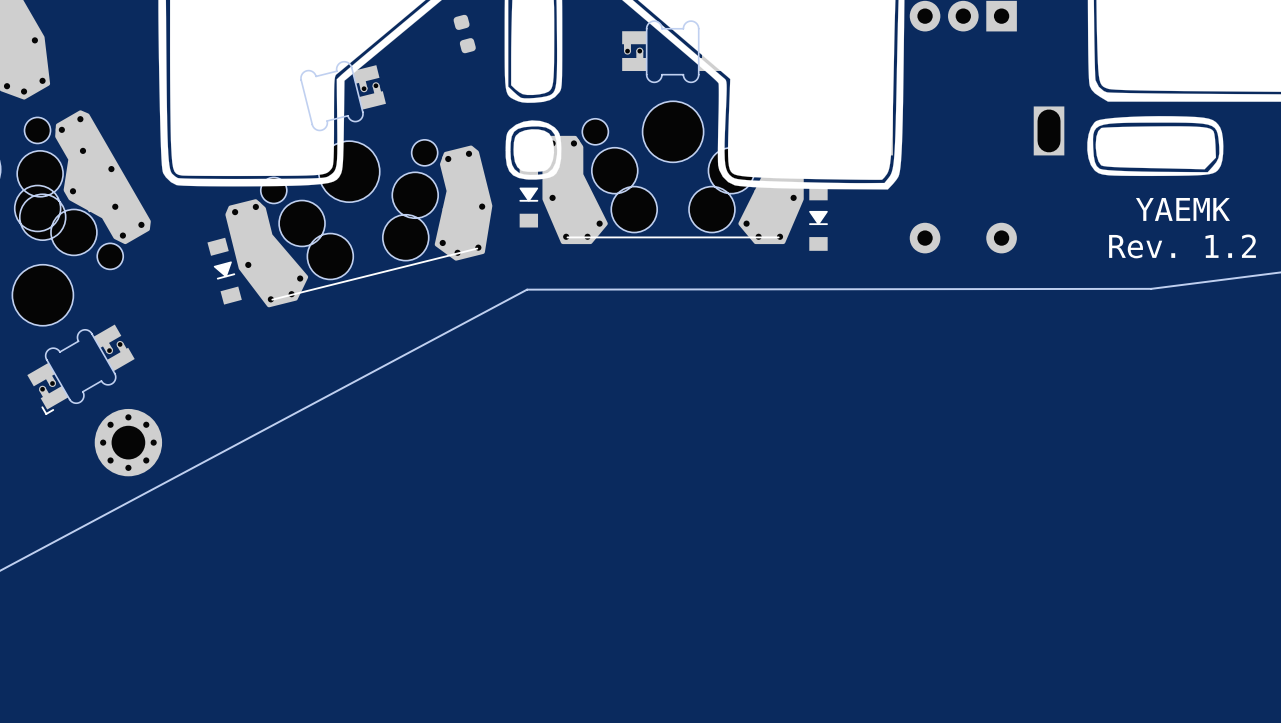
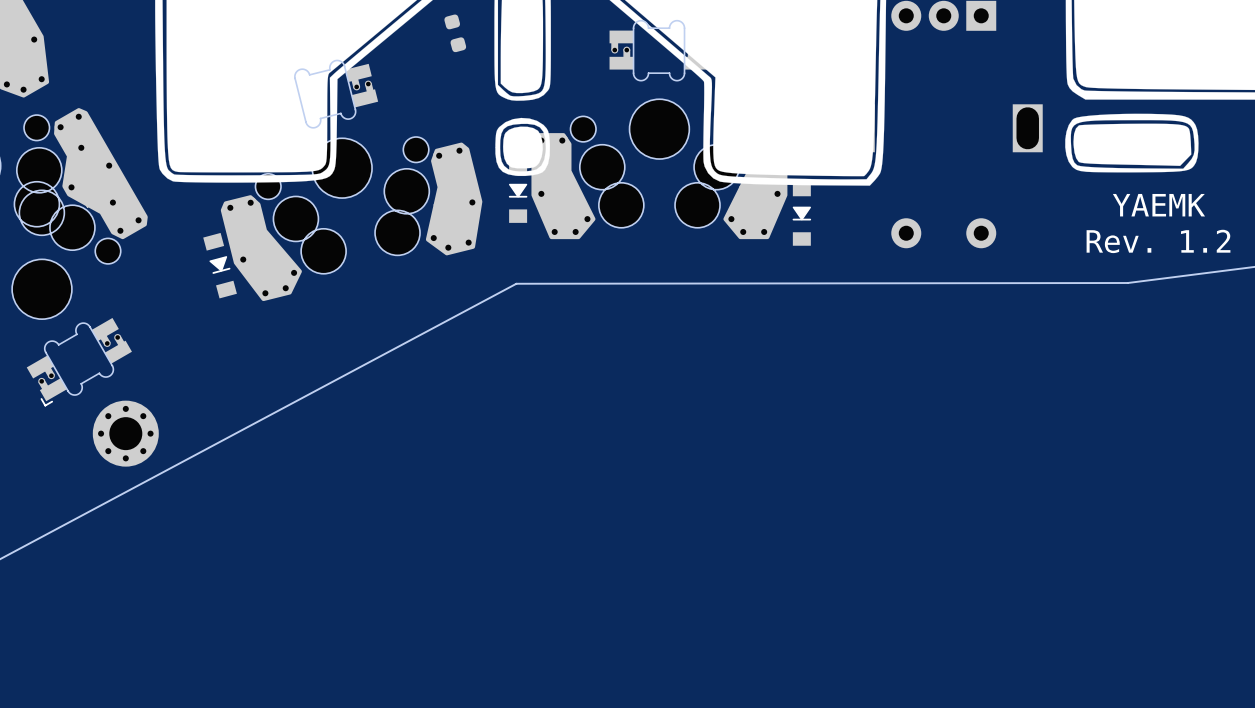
part footprint: [542, 101, 804, 245] -> [531, 99, 788, 240]
part footprint: [225, 139, 493, 308] -> [220, 136, 483, 302]

